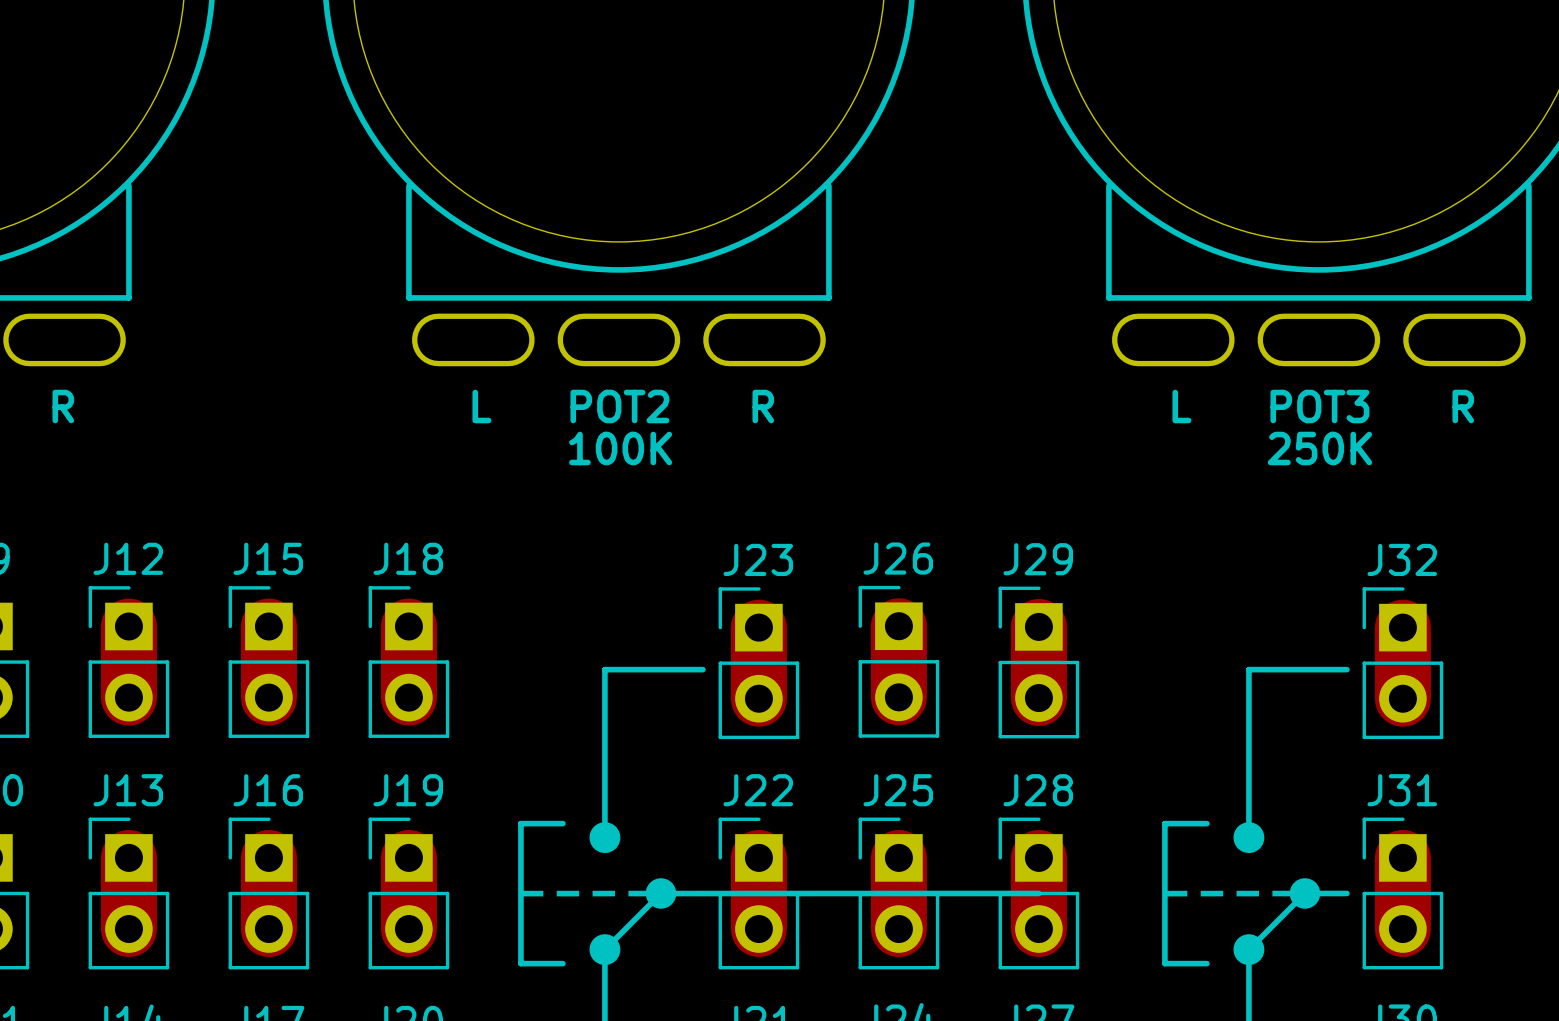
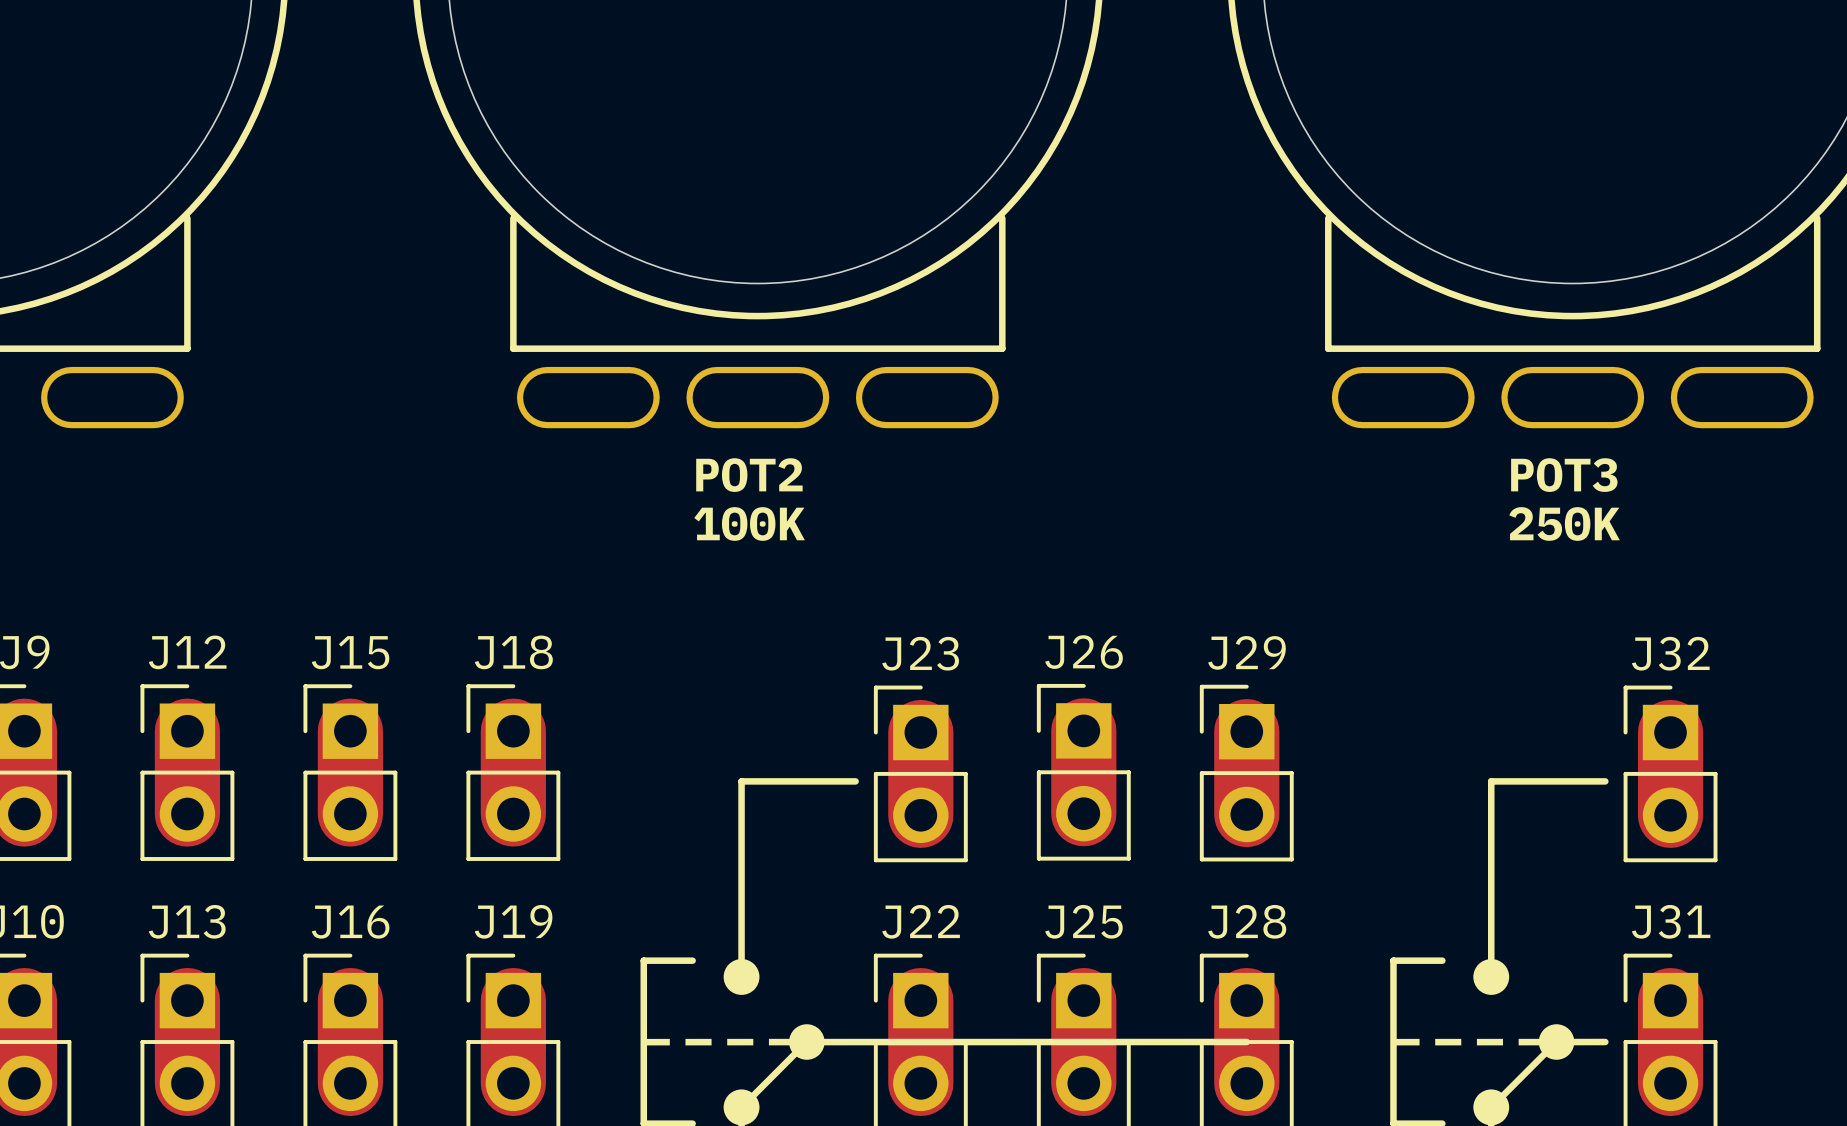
text: R (63, 406) -> none
text: L (481, 406) -> none
text: R (763, 406) -> none
text: L (1181, 406) -> none
text: R (1463, 406) -> none

